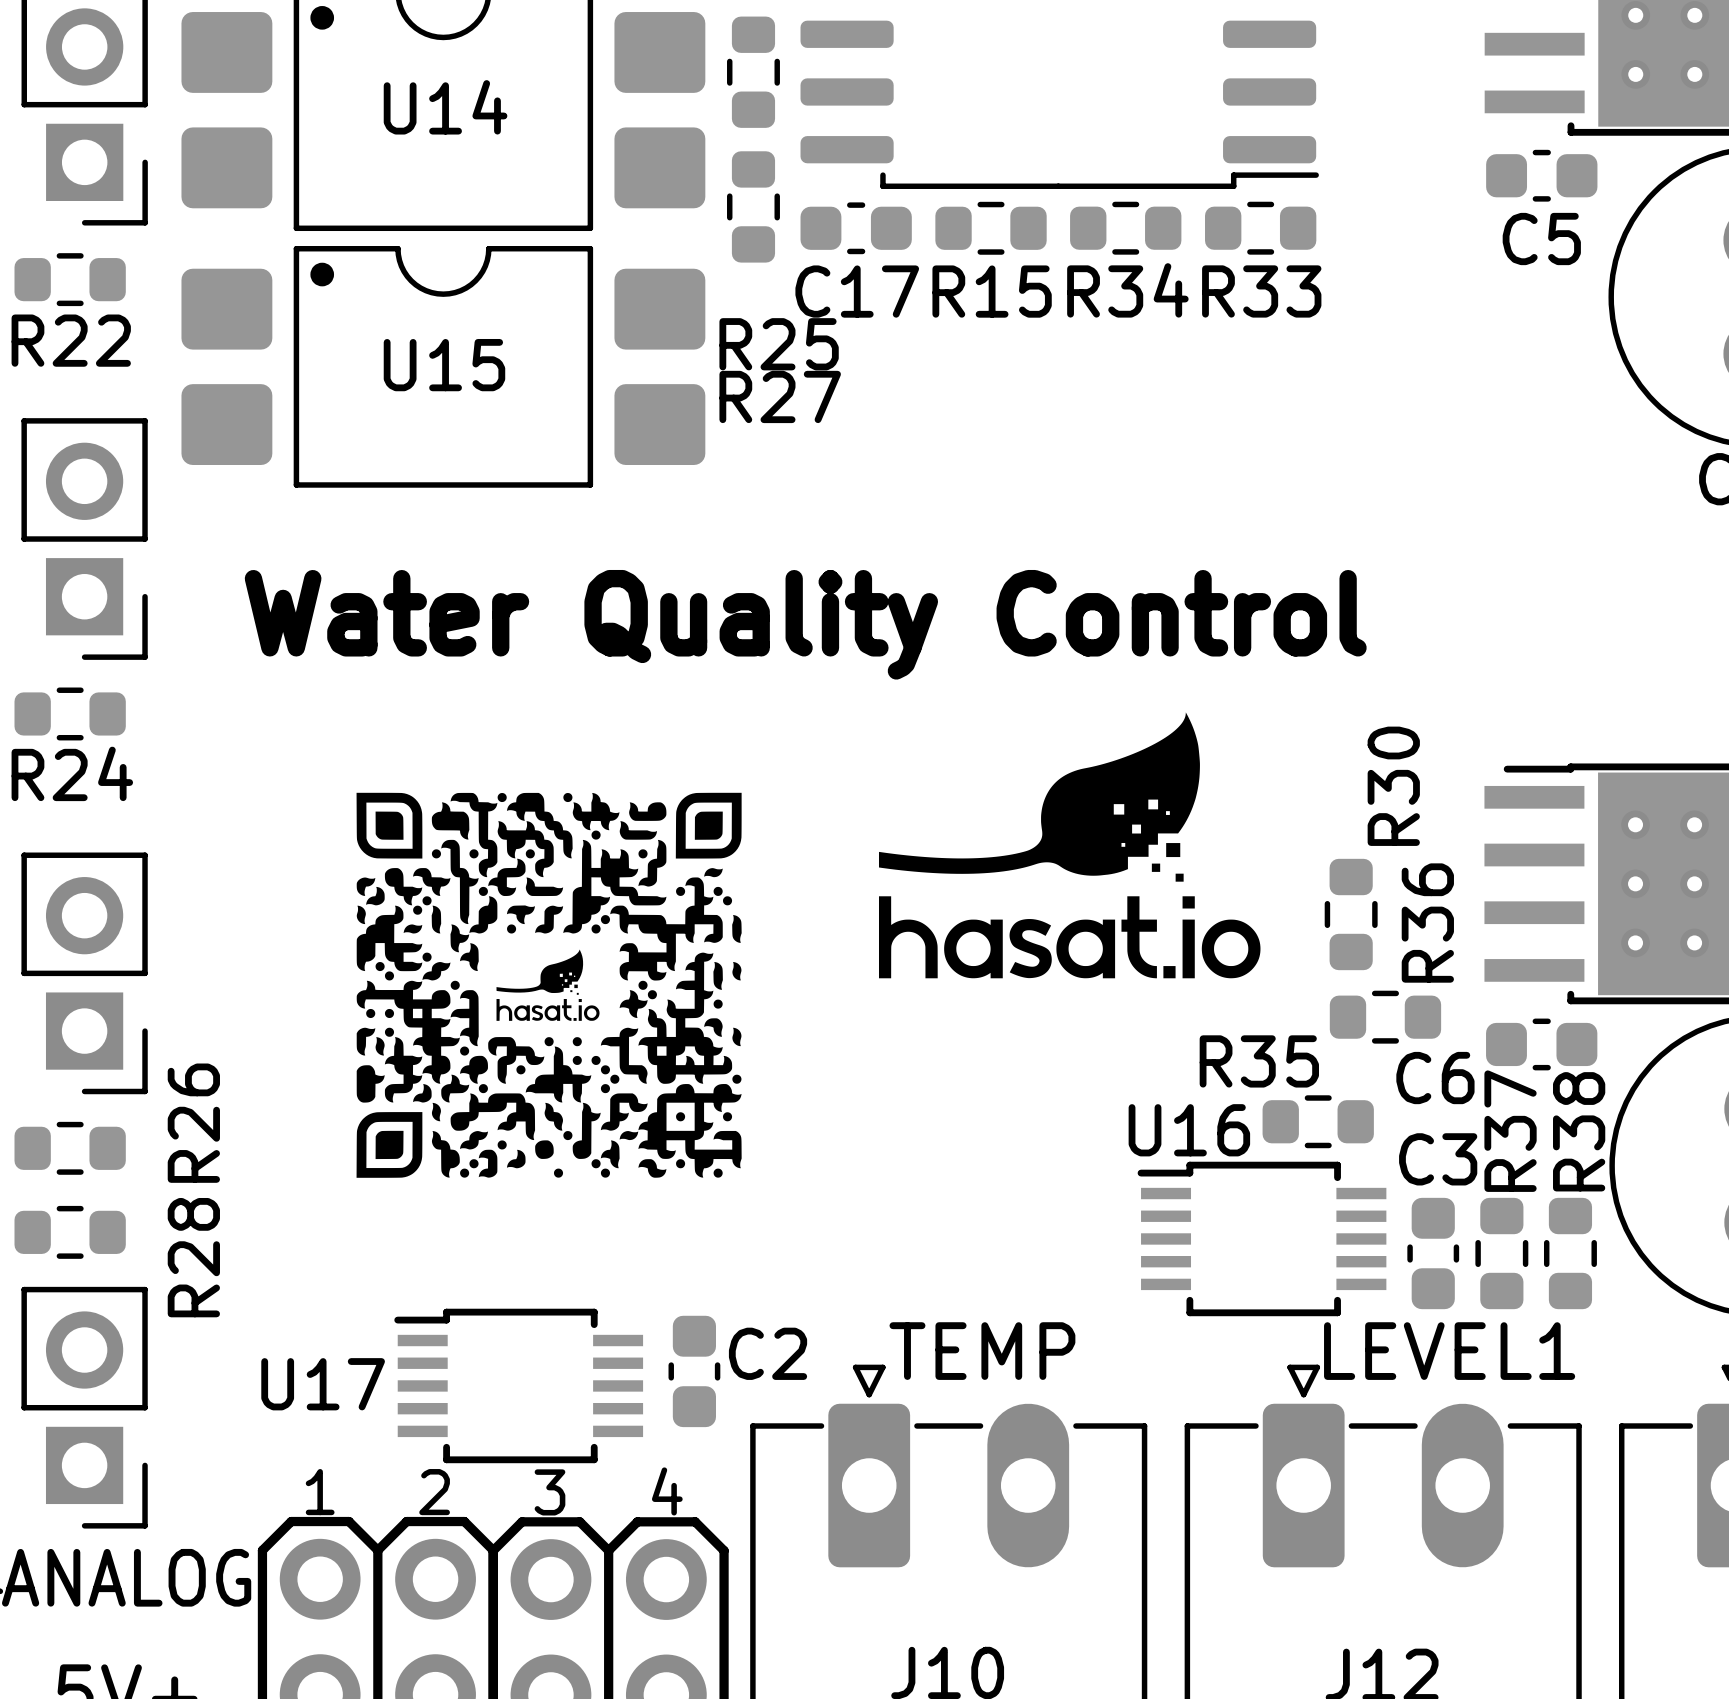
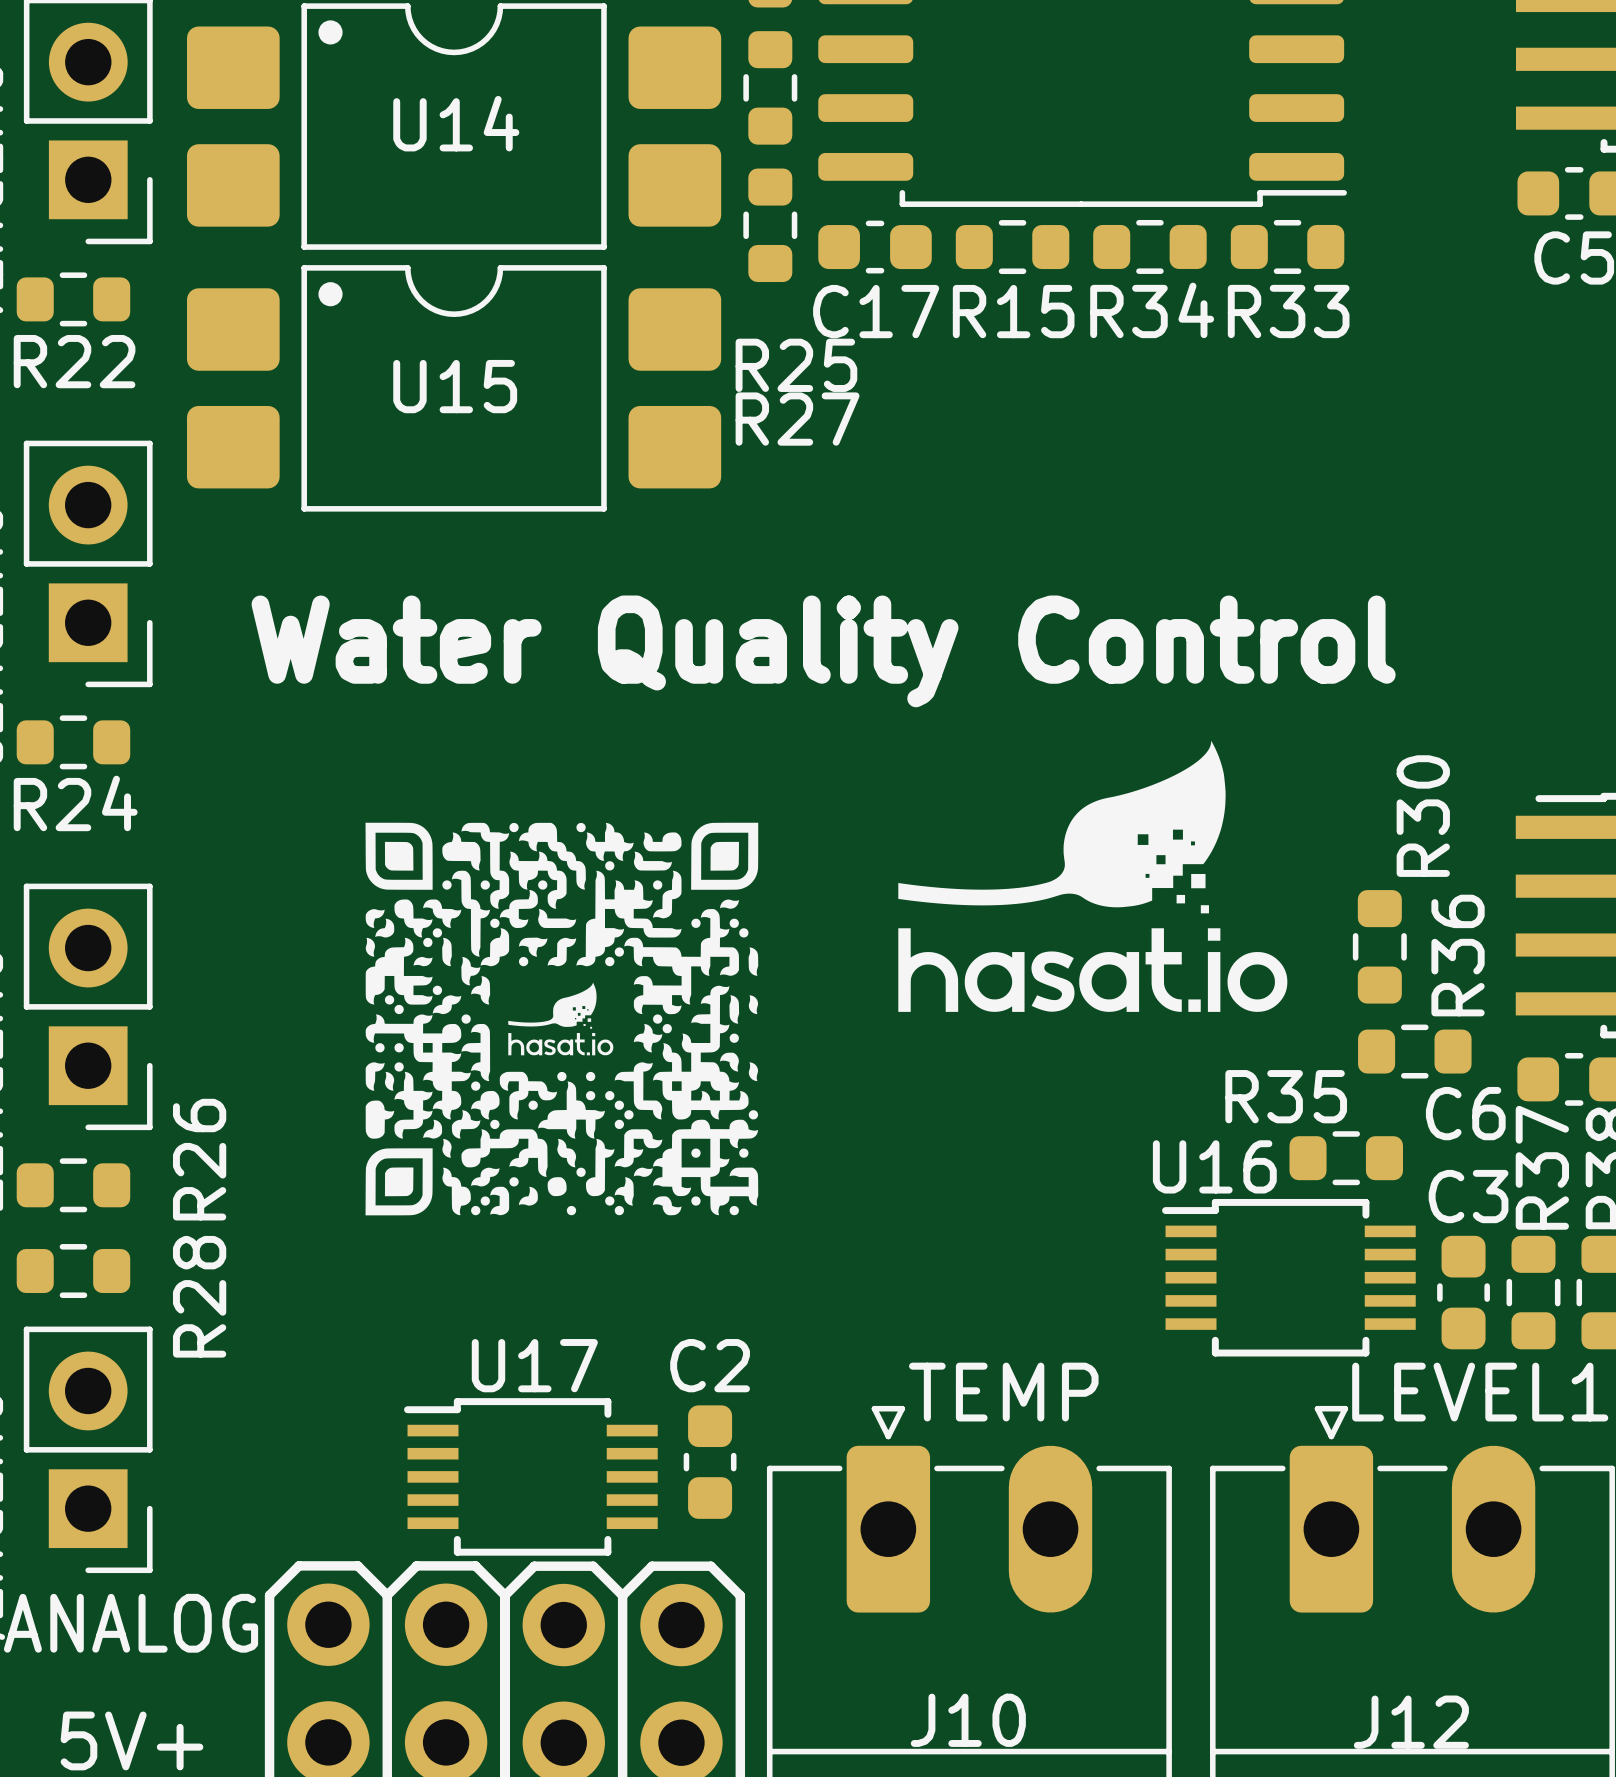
C2 name position: C2 (768, 1353) -> C2 (710, 1365)
C2 position: (694, 1371) -> (710, 1462)
U17 name position: U17 (323, 1384) -> U17 (534, 1365)
U17 position: (518, 1385) -> (530, 1476)
text: 4 (667, 1491) -> none
text: 1 (320, 1492) -> none
text: 2 (434, 1492) -> none
text: 3 (549, 1492) -> none

